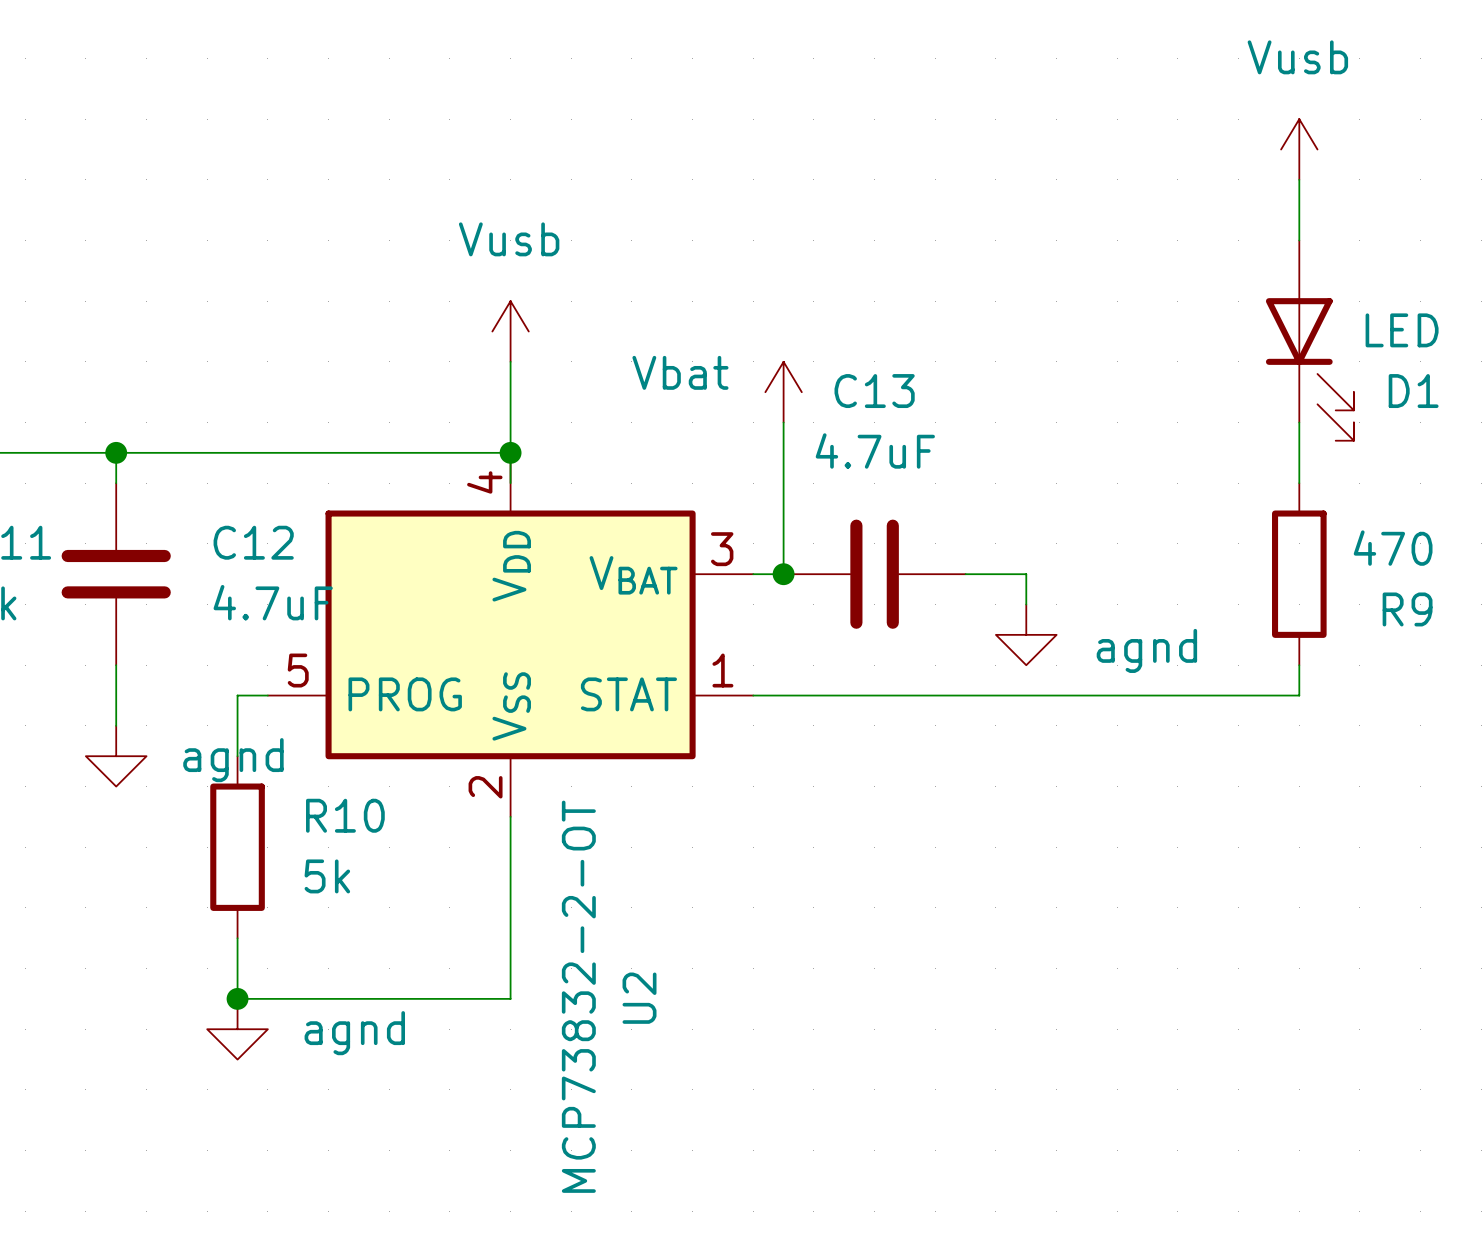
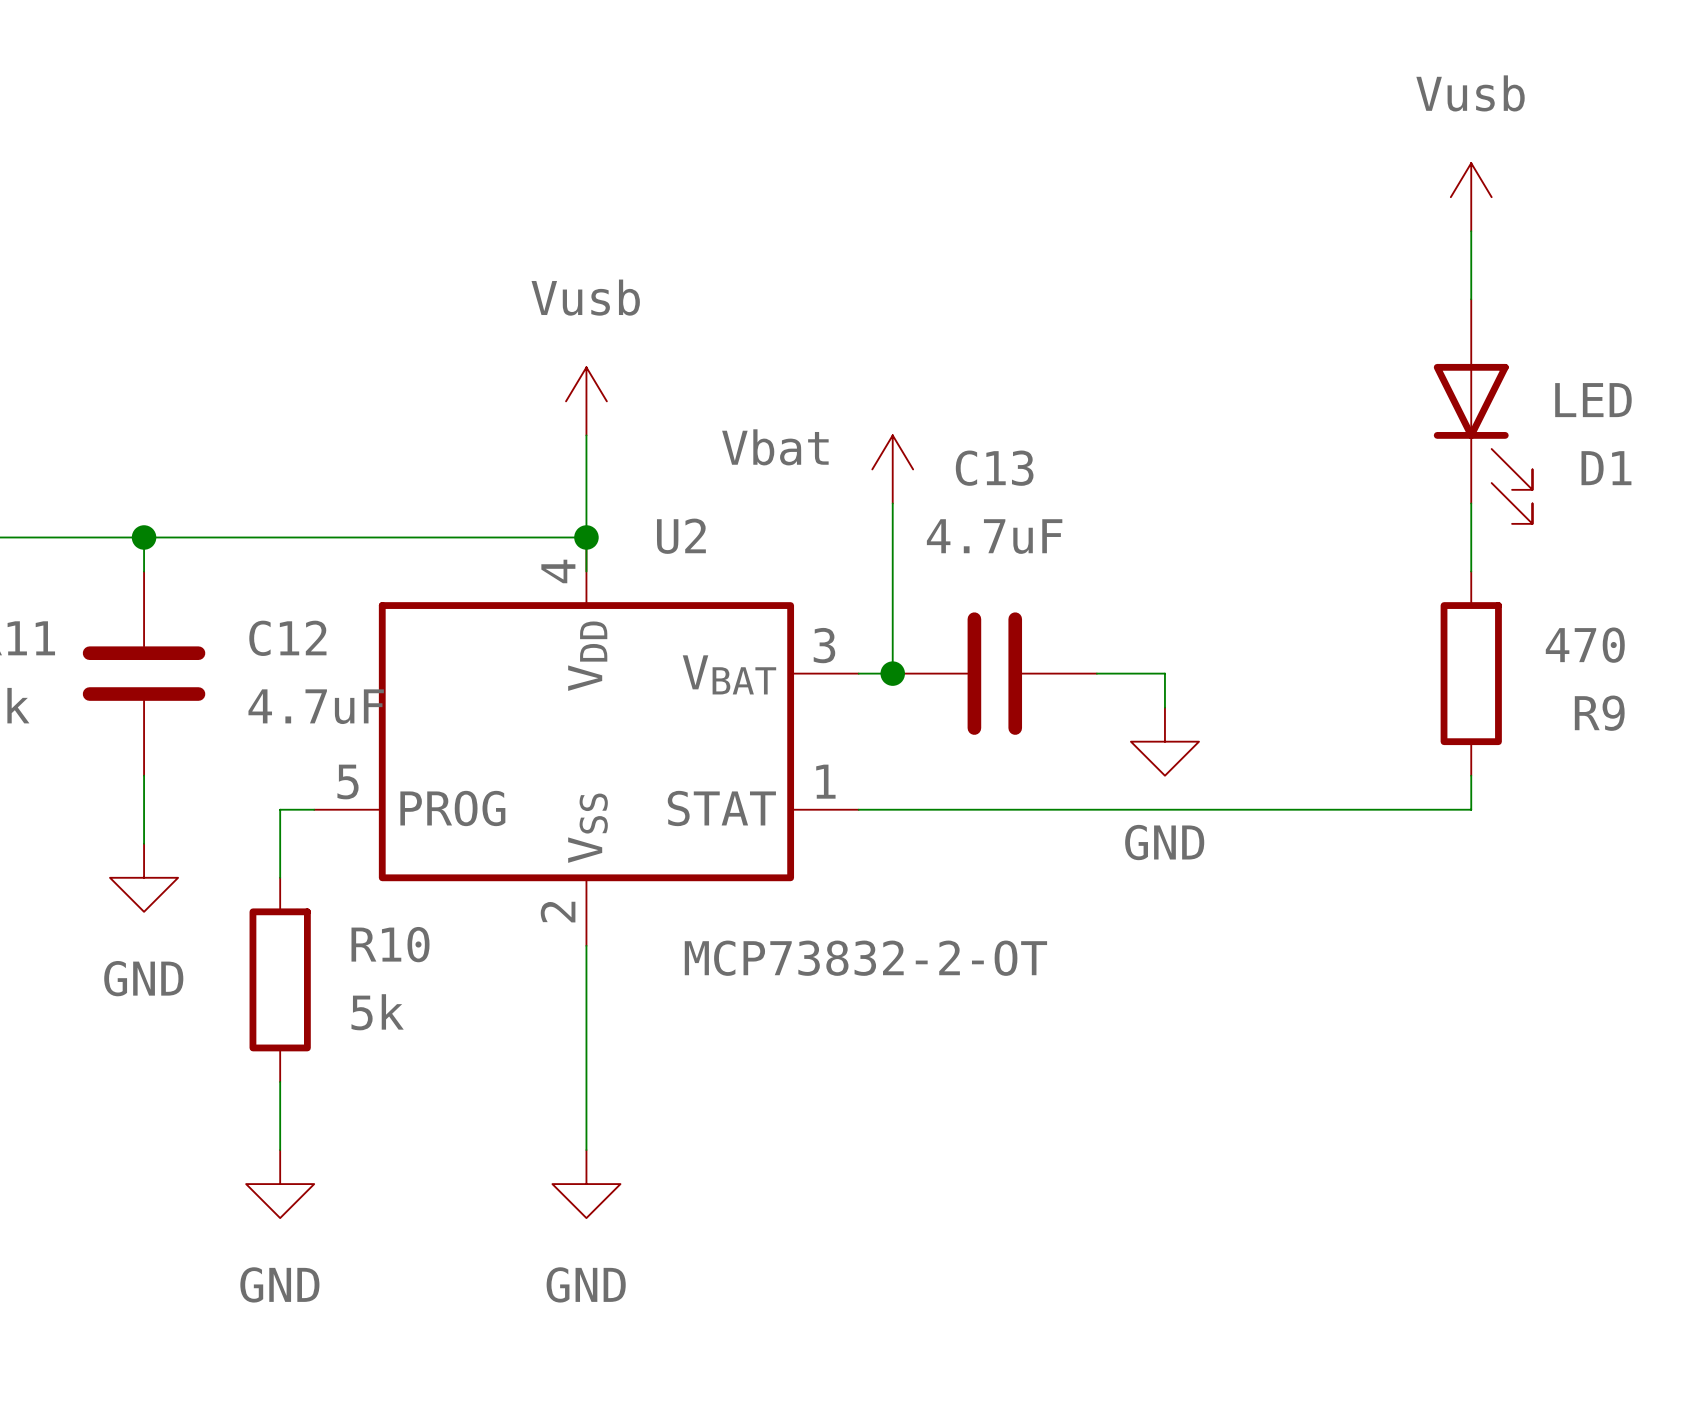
power symbol: agnd (1026, 634) -> GND (1164, 741)
power symbol: agnd (116, 756) -> GND (144, 877)
U2 value rotation: 0° (578, 996) -> 90° clockwise (865, 958)
wire: (237, 998) (510, 998) -> none
junction: (237, 998) -> none
U2 name rotation: 0° (639, 998) -> 90° clockwise (681, 536)
U2 name position: U2 (639, 998) -> U2 (681, 536)
power symbol: agnd (237, 1029) -> GND (280, 1184)
power symbol: none -> GND (586, 1184)

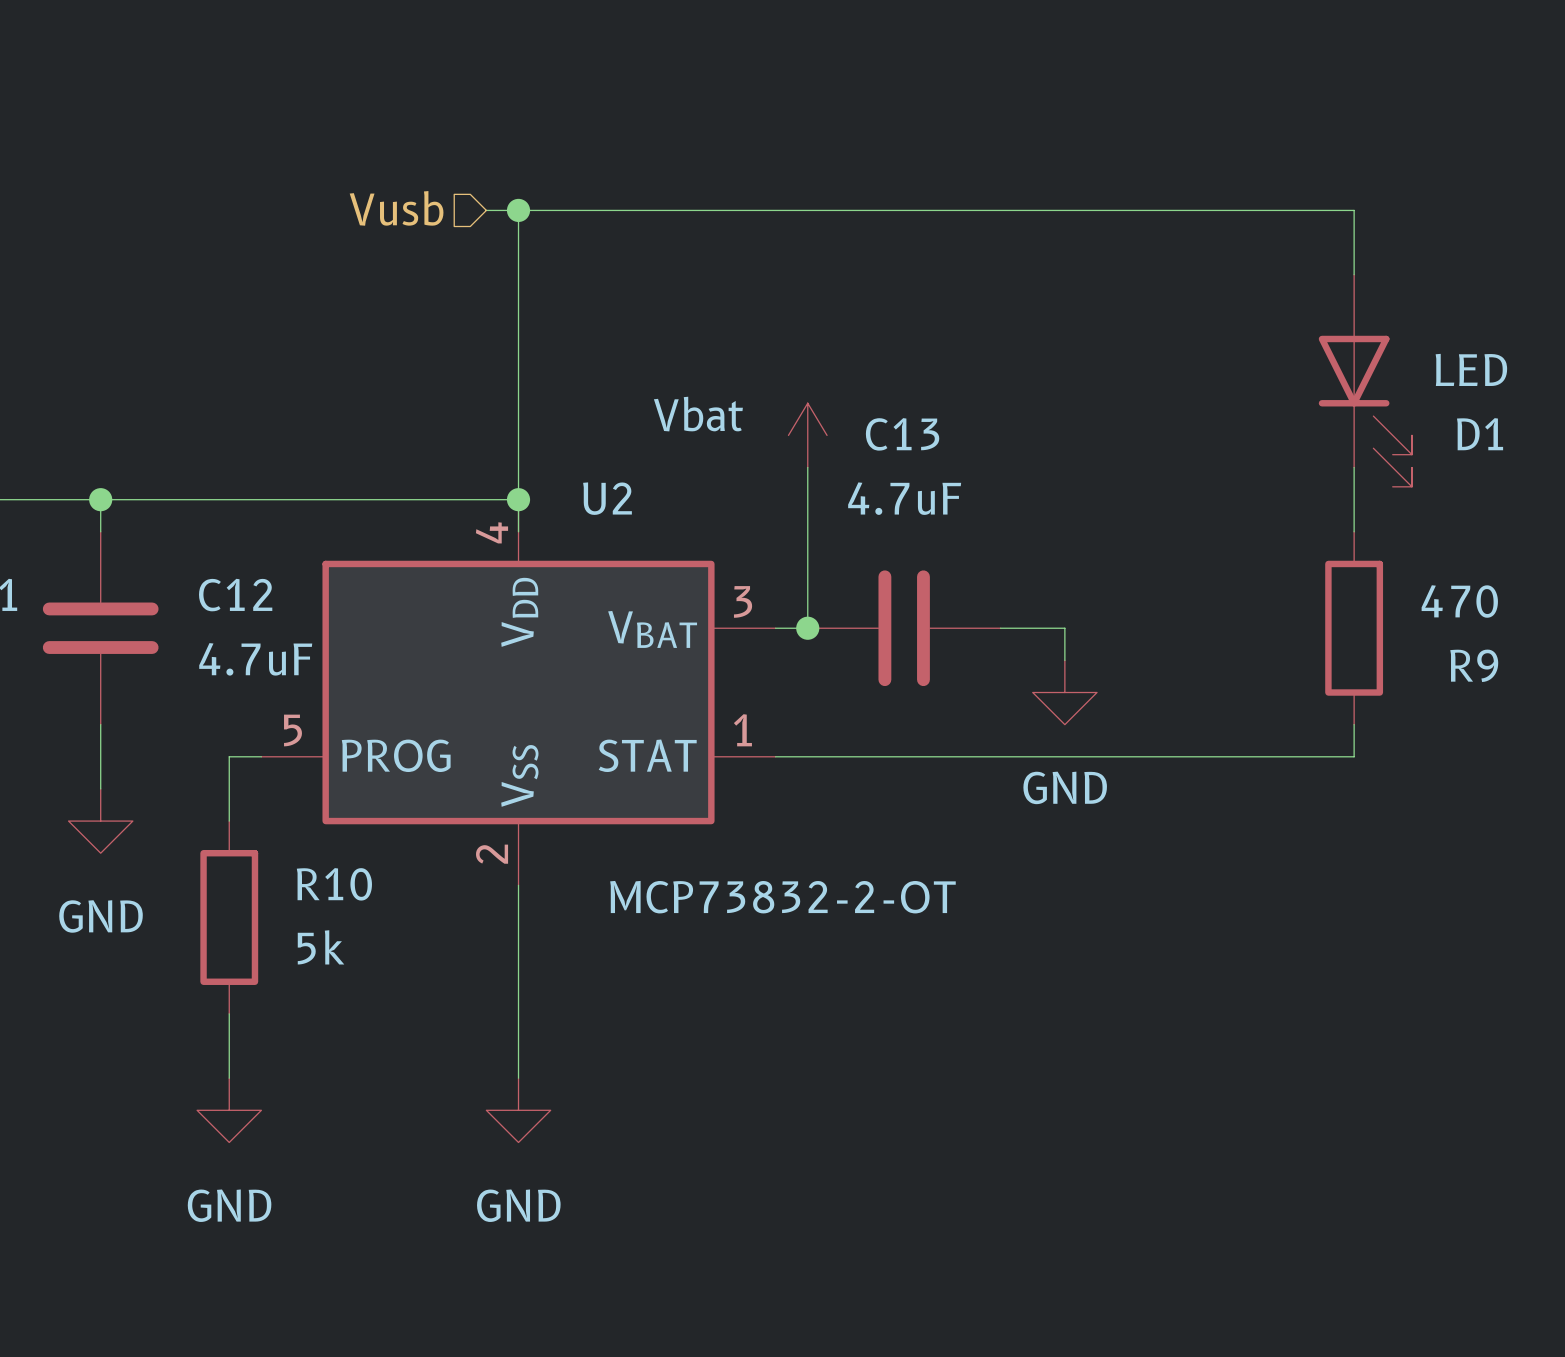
power symbol: Vusb (1471, 197) -> none
hierarchical label: none -> Vusb (396, 208)
wire: none -> (486, 210) (1354, 210)
wire: none -> (518, 210) (518, 403)
junction: none -> (518, 210)
power symbol: Vusb (586, 401) -> none

